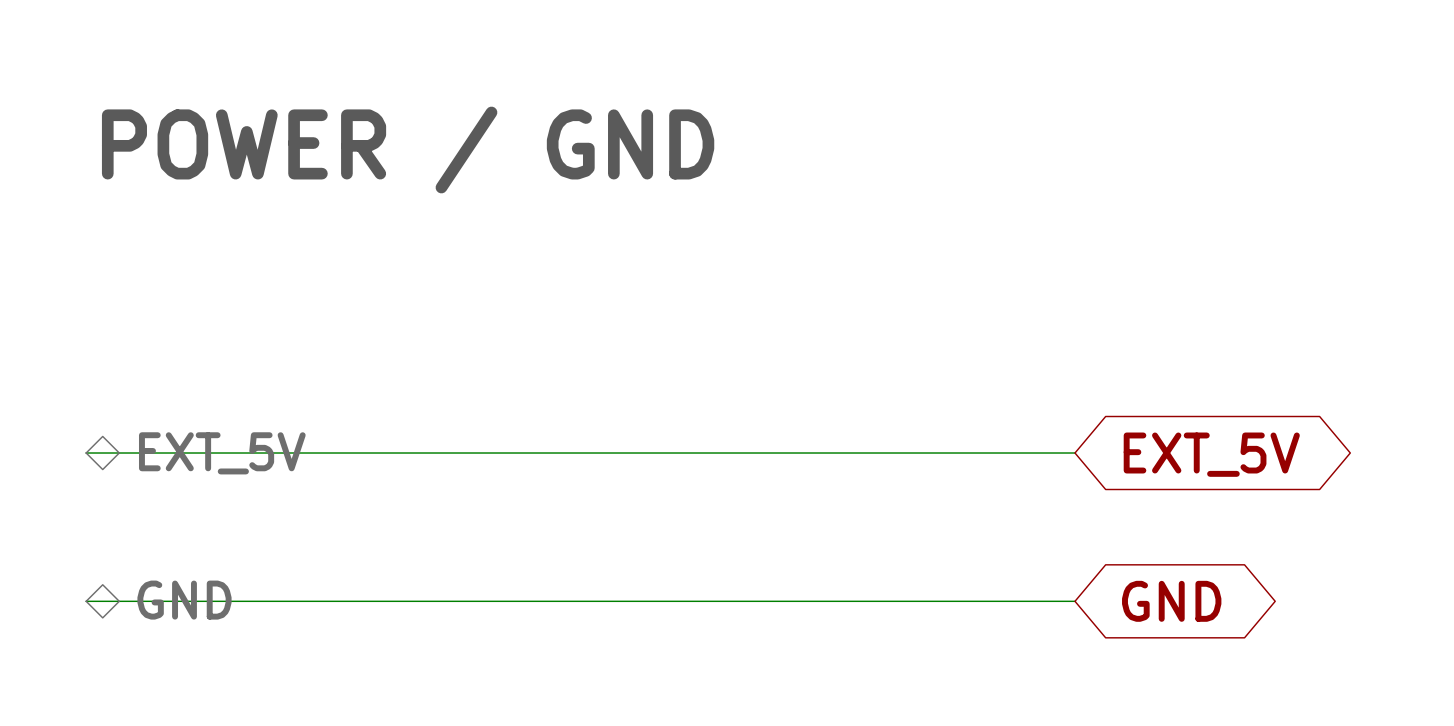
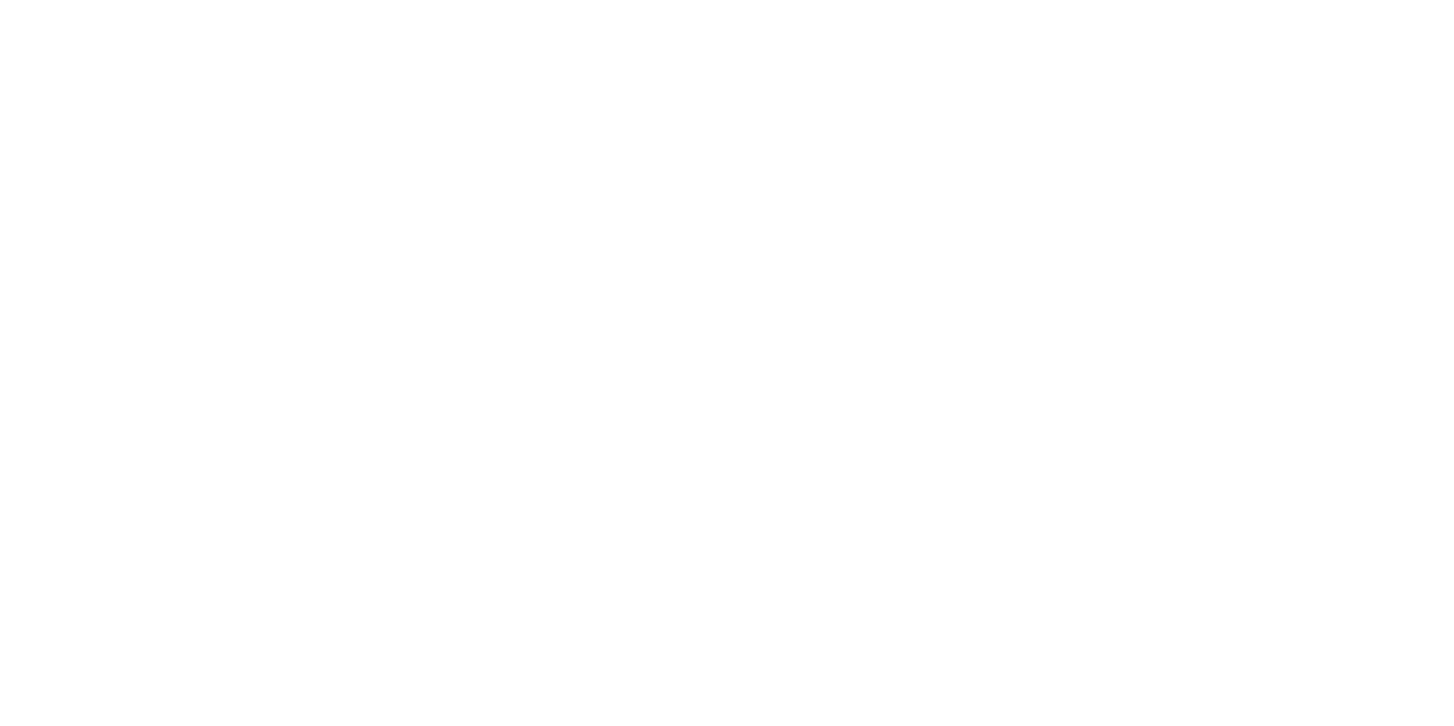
text: POWER / GND (408, 150) -> none
wire: (86, 453) (1075, 453) -> none
hierarchical label: EXT_5V (222, 453) -> none
global label: EXT_5V (1211, 454) -> none
hierarchical label: GND (184, 600) -> none
wire: (86, 601) (1075, 601) -> none
global label: GND (1171, 601) -> none

